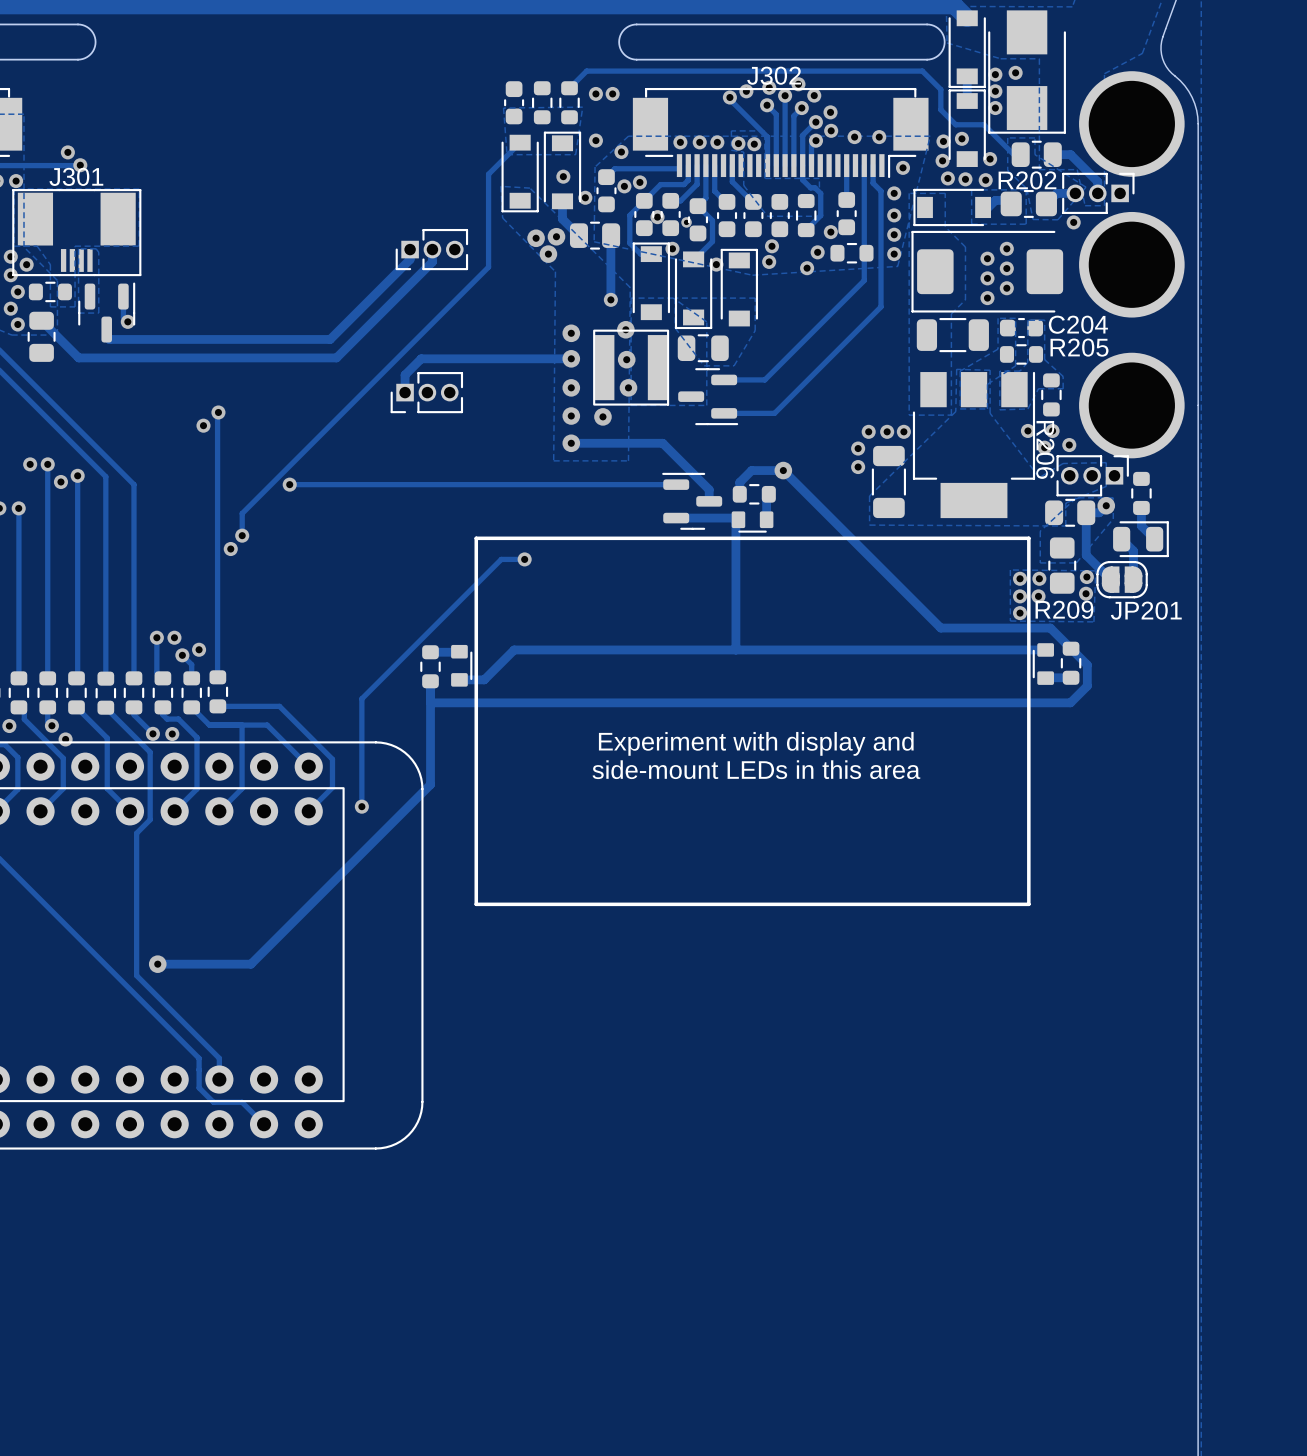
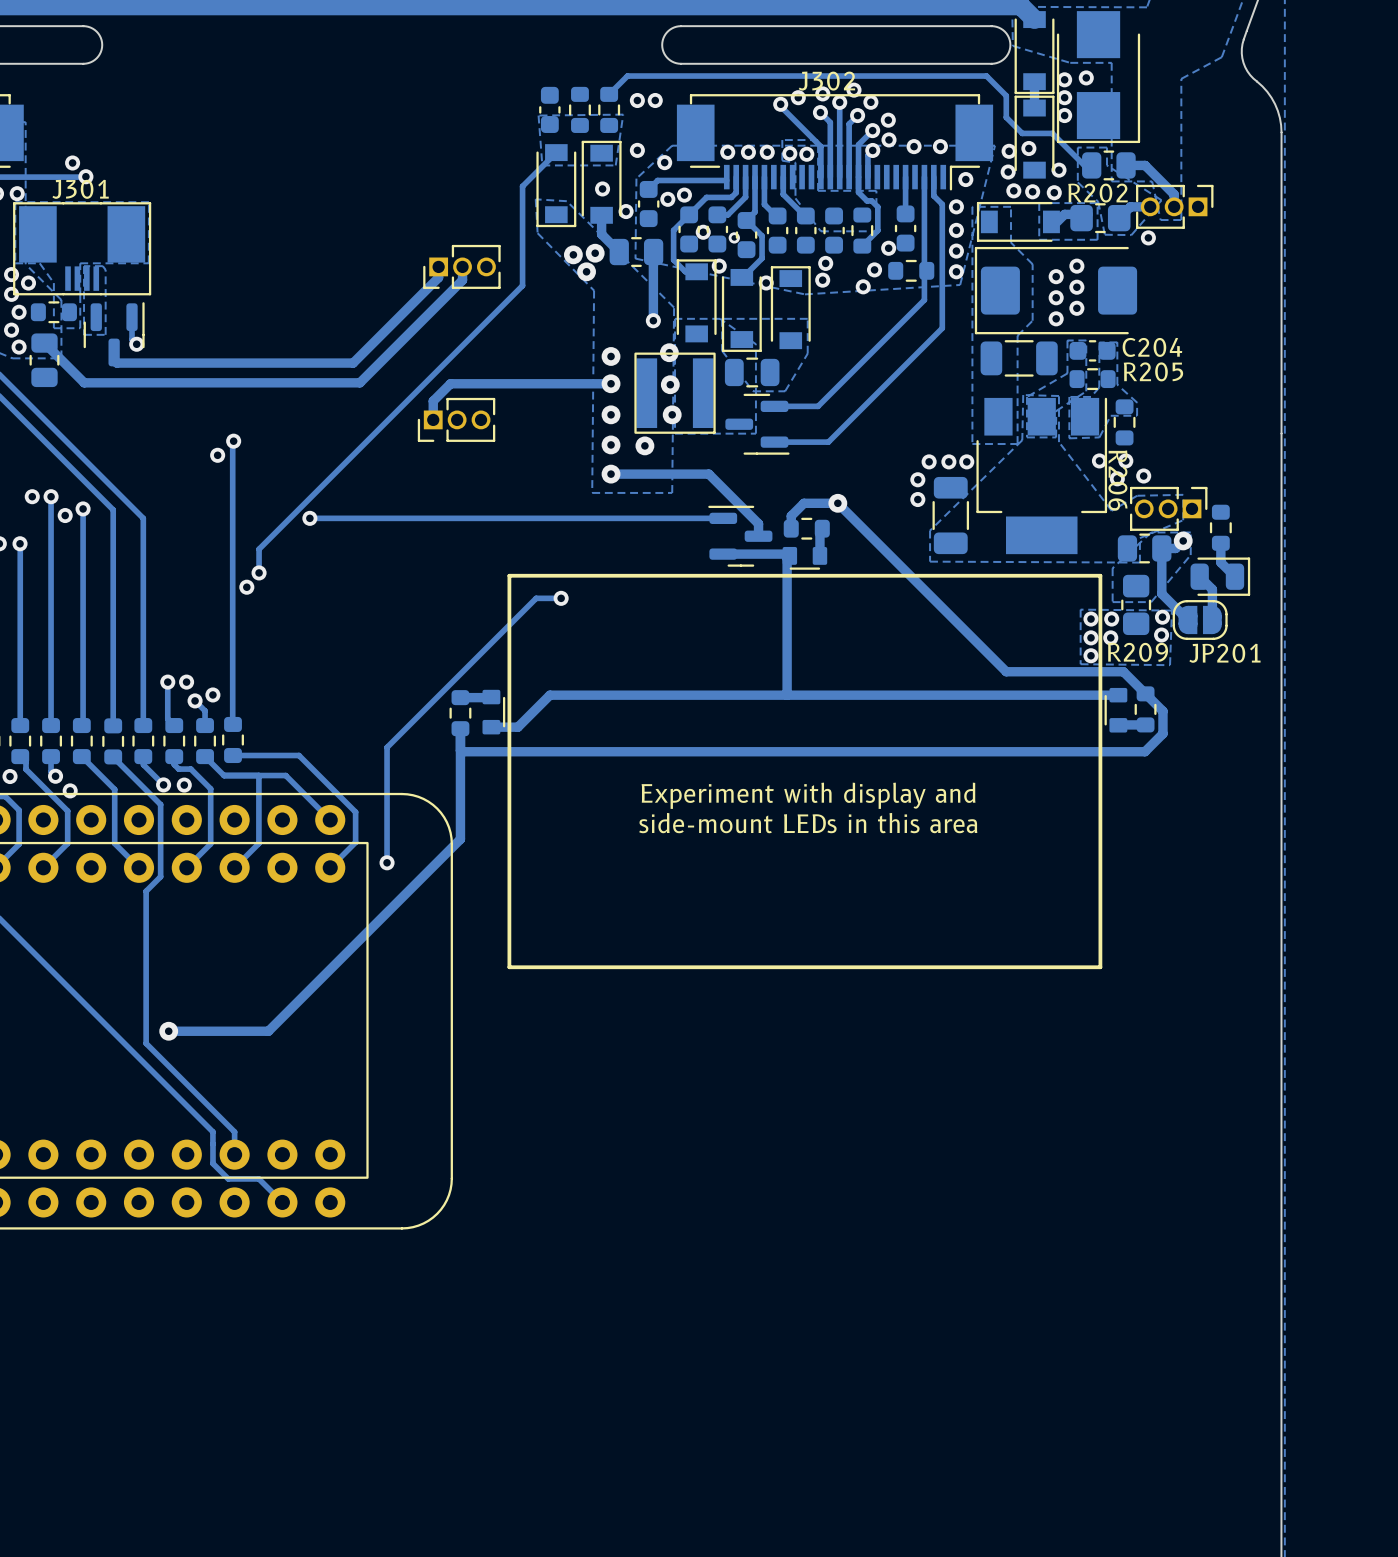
part: (1131, 264) -> none

